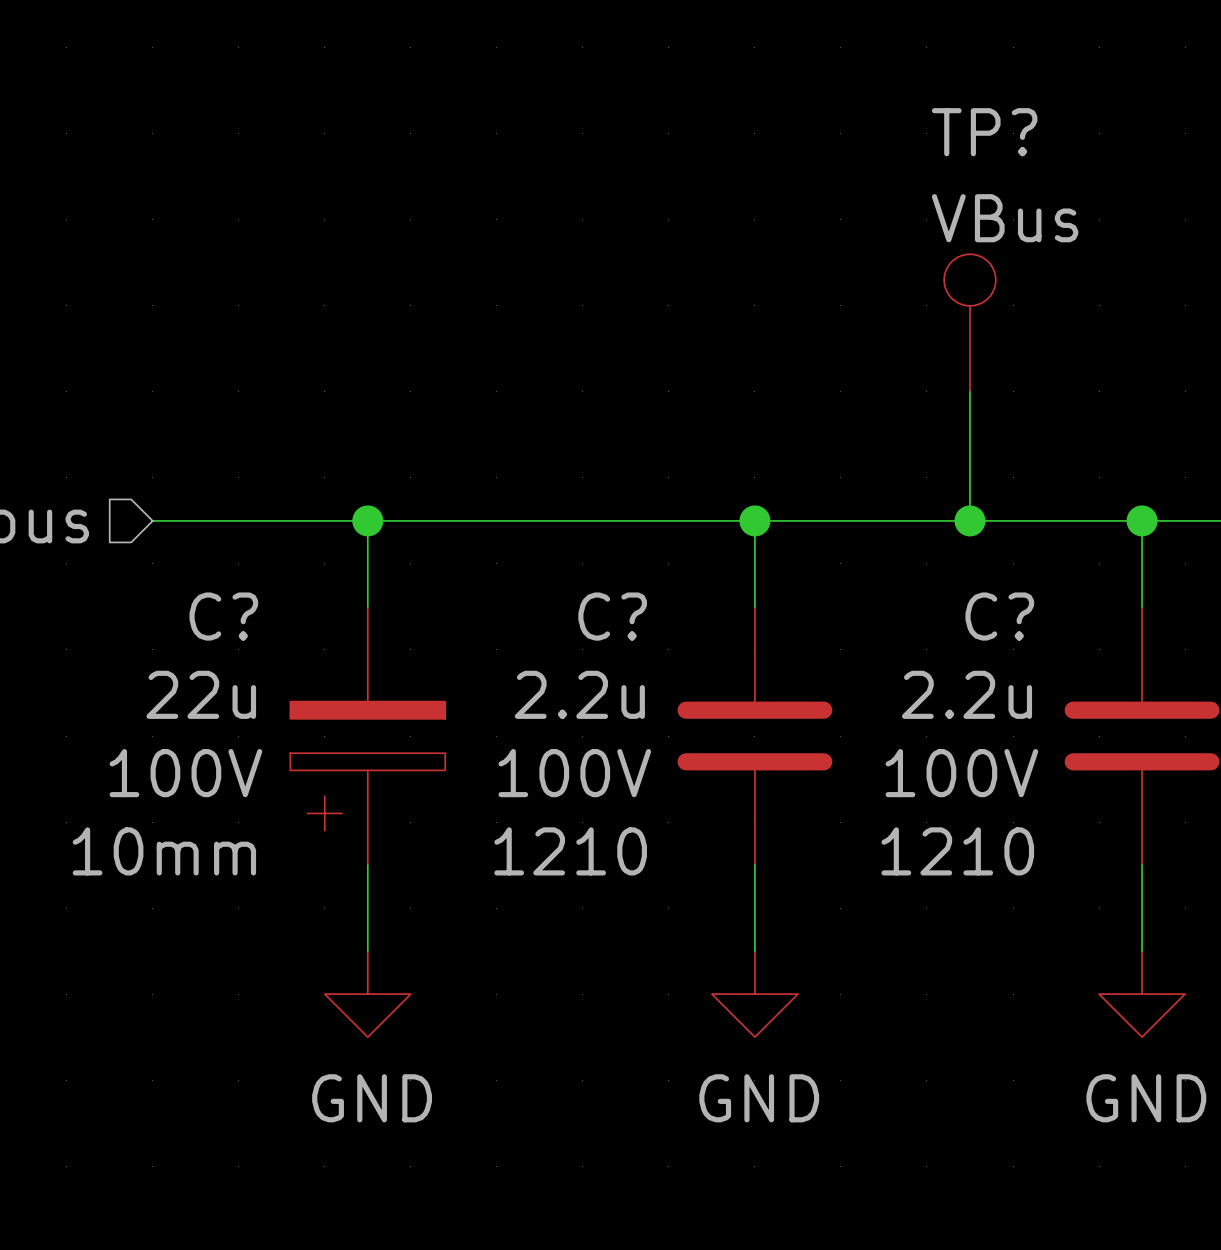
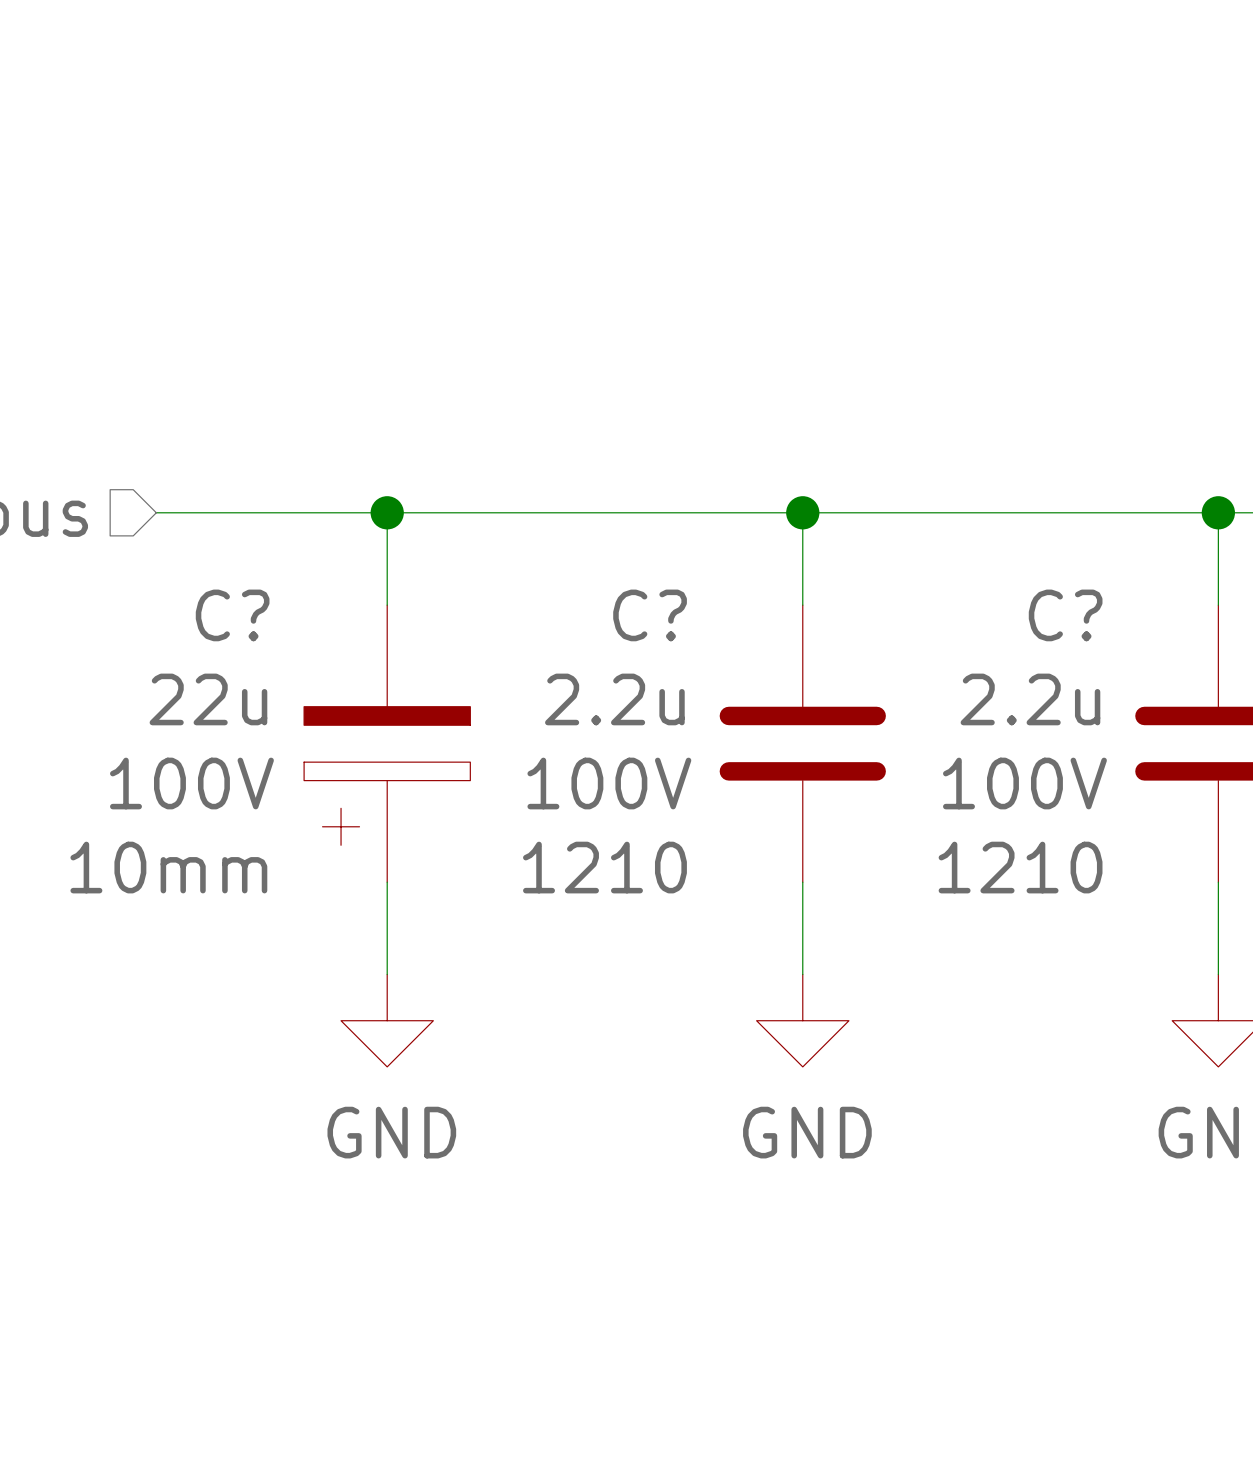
TP?: VBus (969, 323) -> none
wire: (969, 391) (969, 520) -> none
junction: (969, 520) -> none

